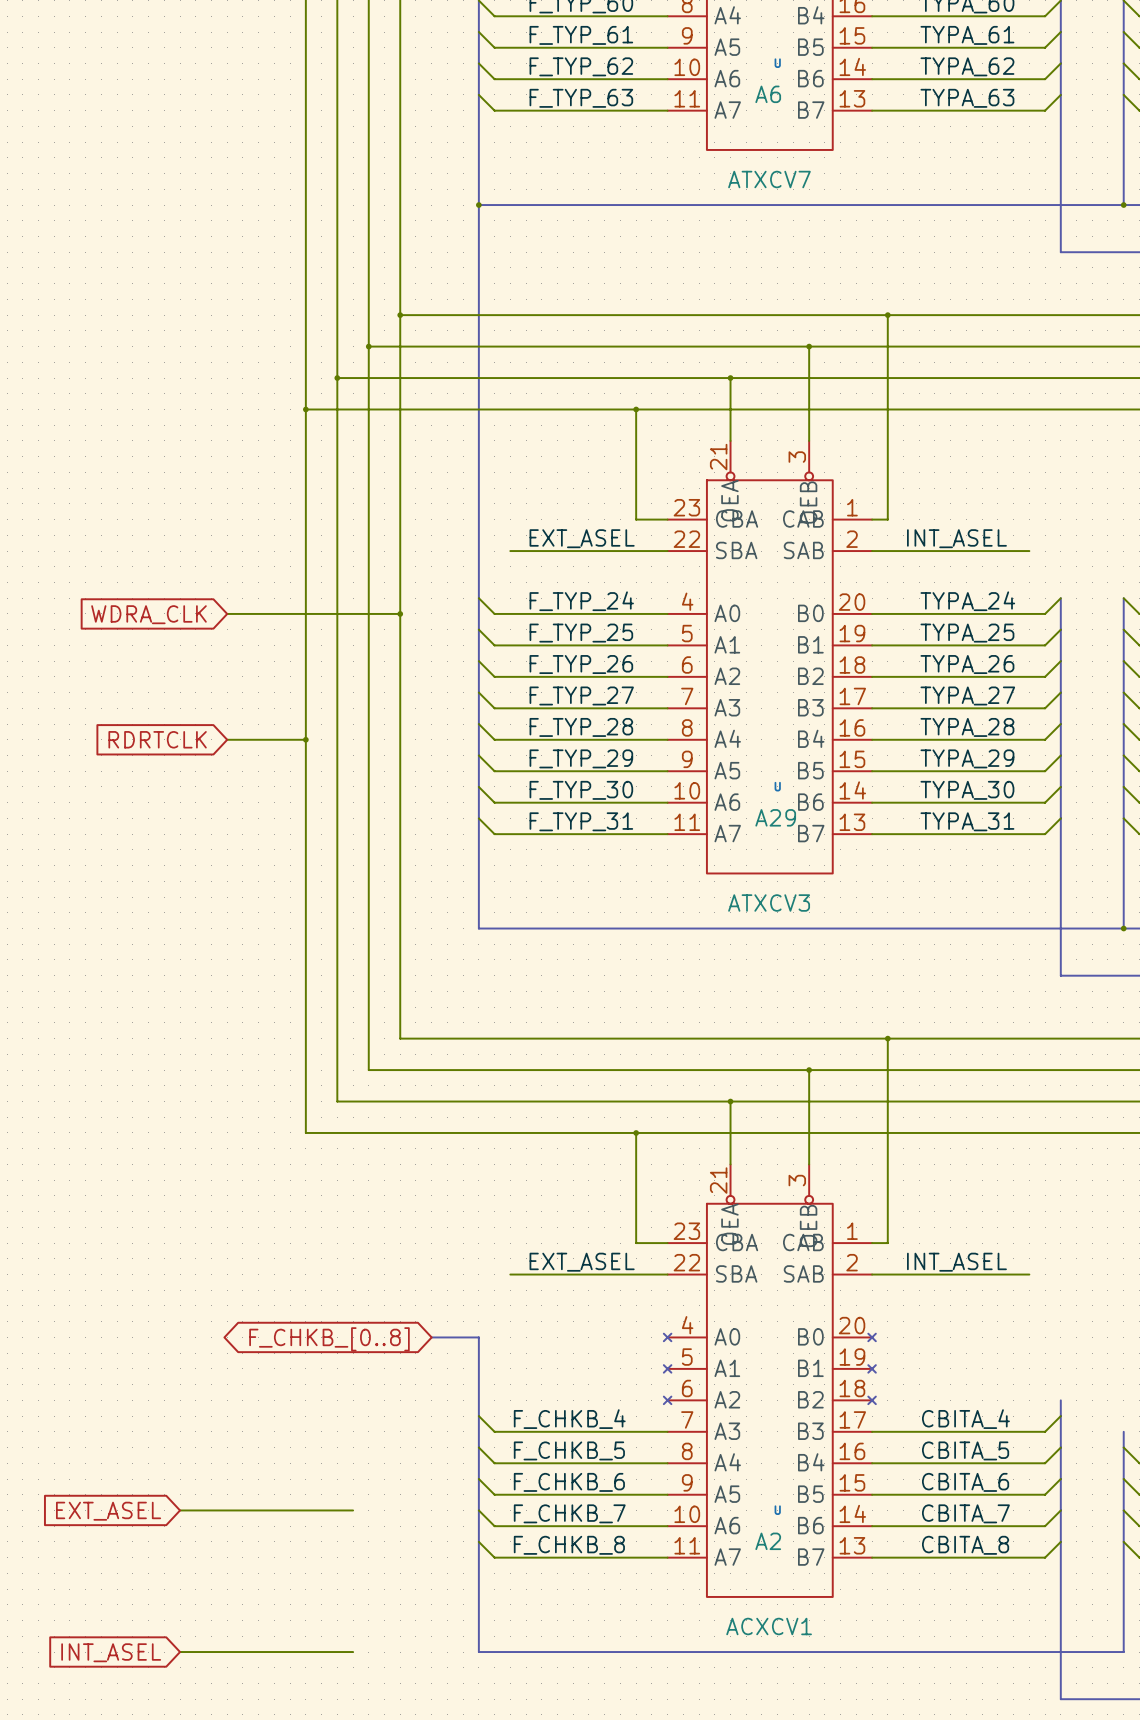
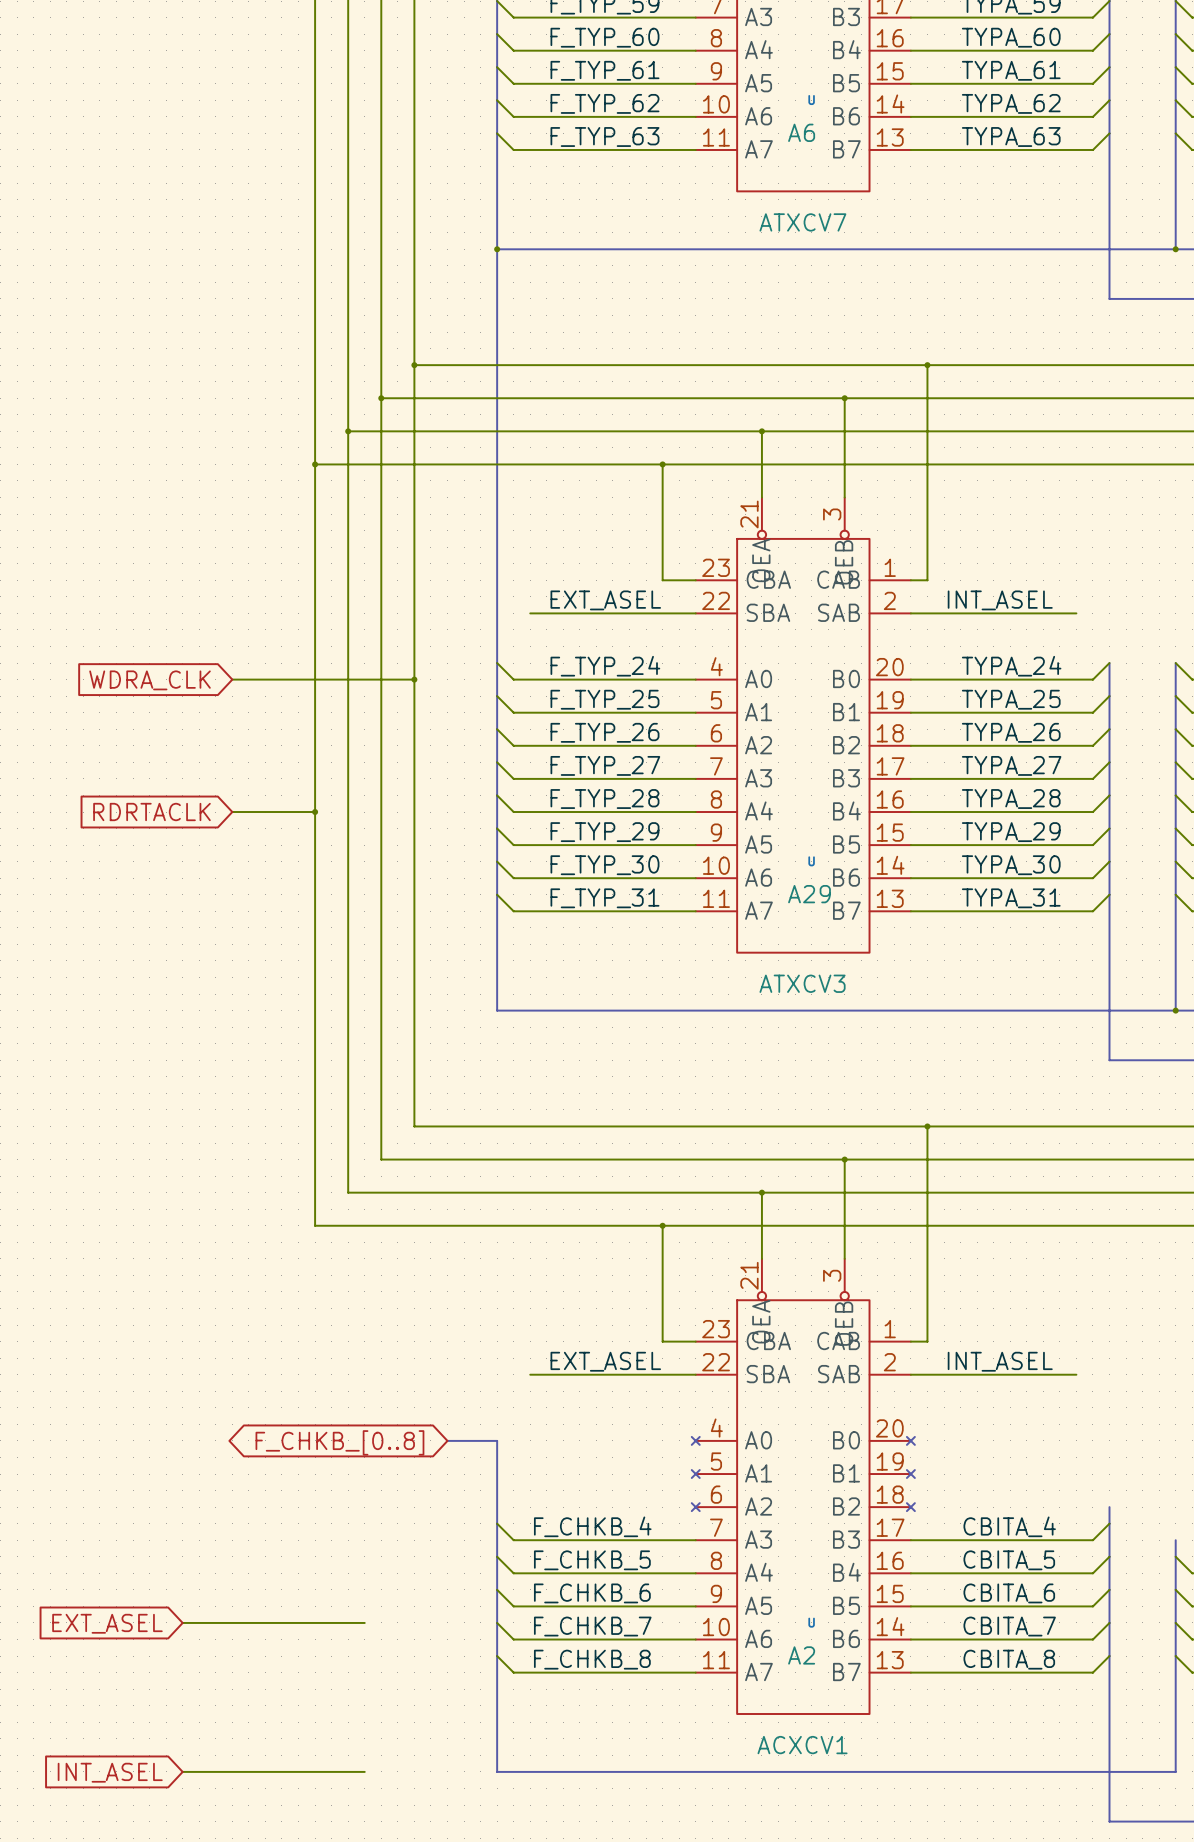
global label: RDRTCLK (157, 739) -> RDRTACLK (151, 812)

